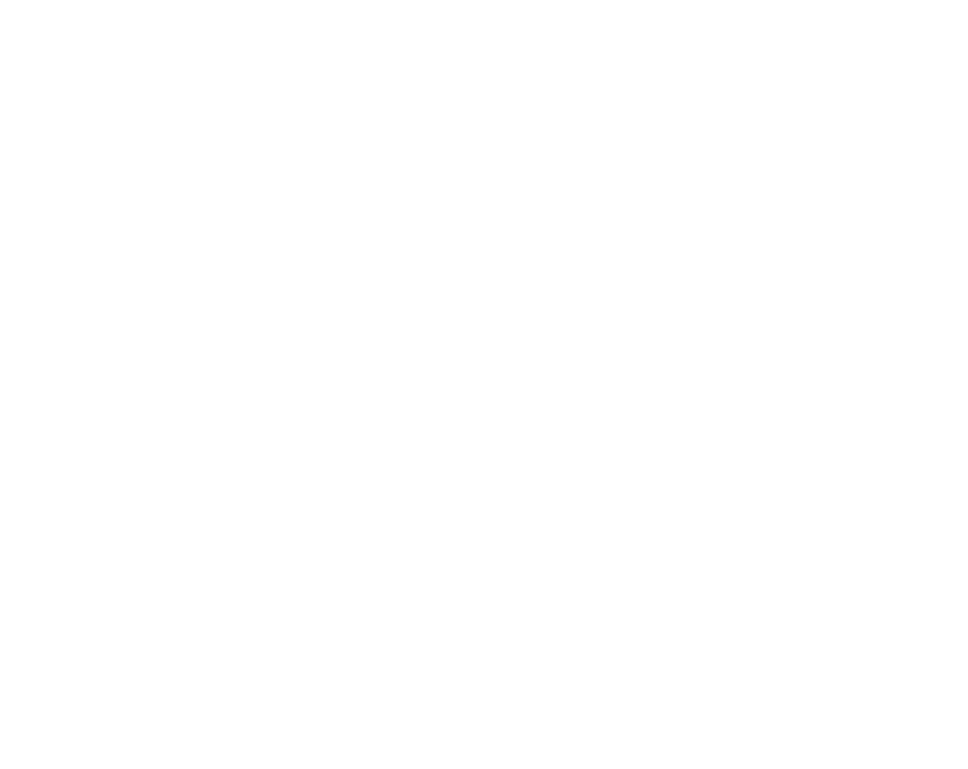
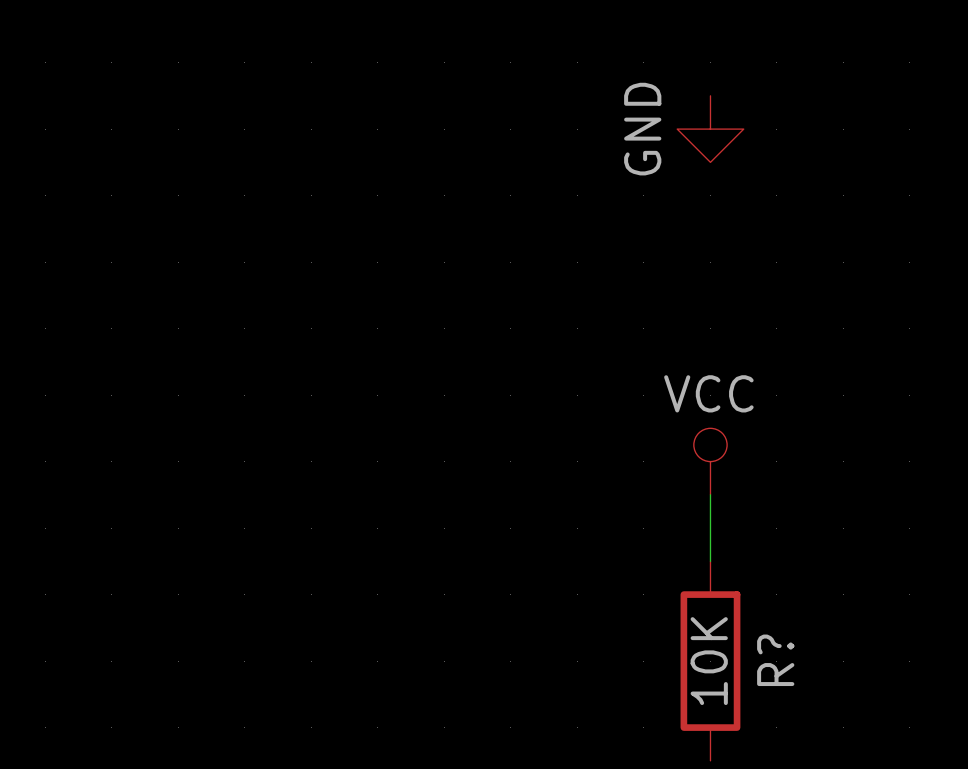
power symbol: none -> GND (710, 129)
power symbol: none -> VCC (710, 461)
wire: none -> (710, 494) (710, 561)
R?: none -> 10K (710, 661)

